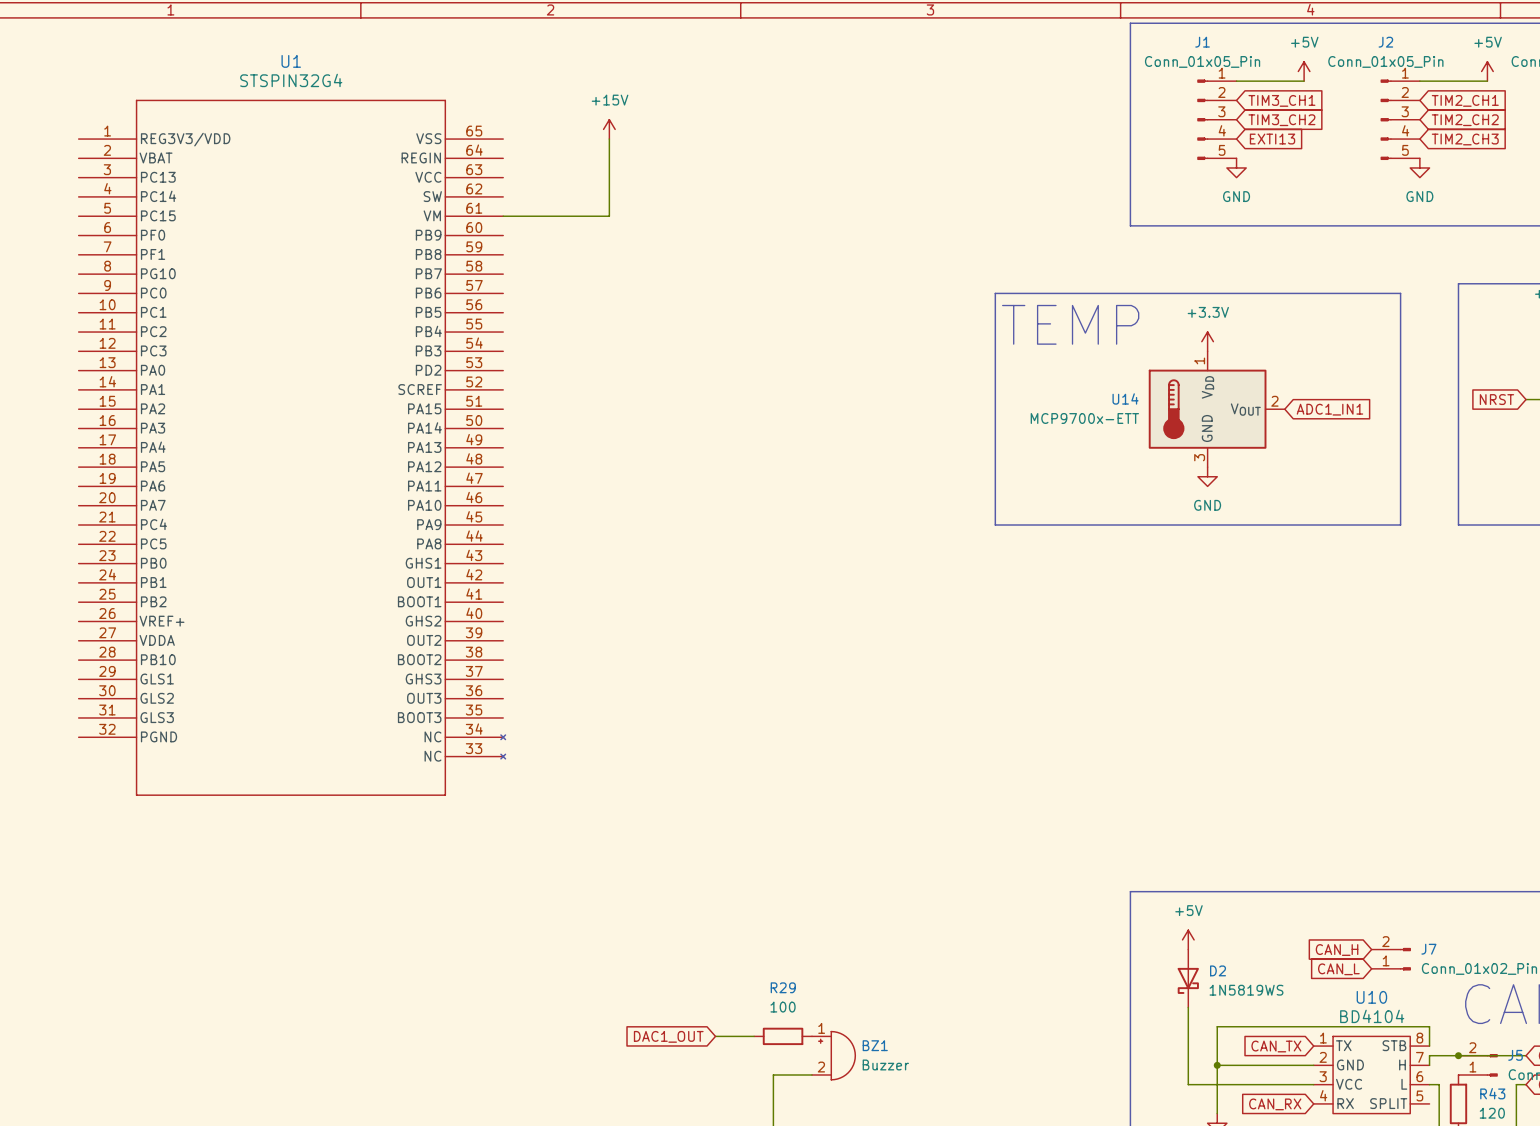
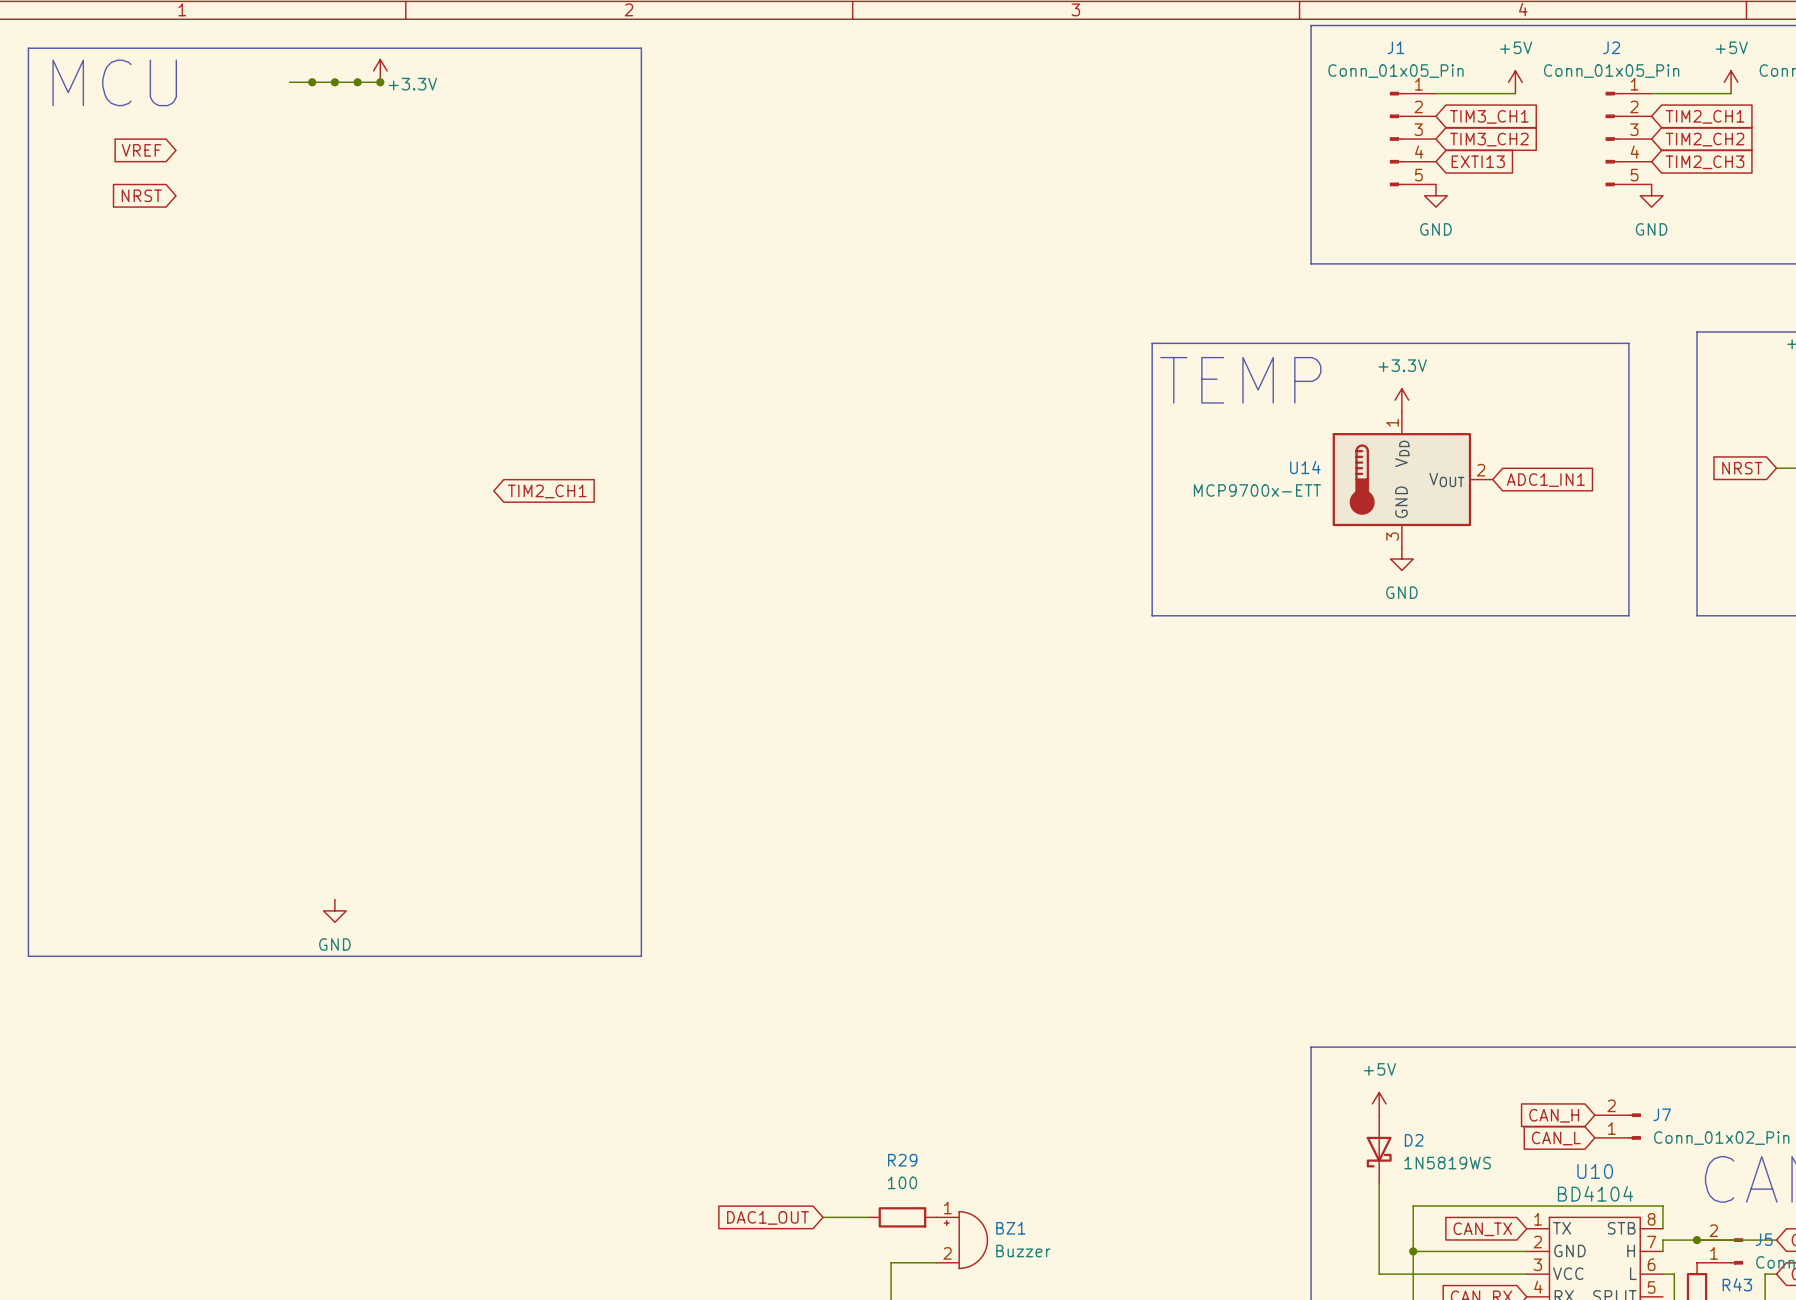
line: none -> (28, 48) (641, 48) (641, 956) (28, 956) (28, 48)
power symbol: none -> +3.3V (380, 70)
wire: none -> (289, 82) (380, 82)
junction: none -> (312, 82)
junction: none -> (334, 82)
junction: none -> (357, 82)
junction: none -> (380, 82)
text: none -> MCU (114, 82)
global label: none -> VREF (141, 150)
power symbol: +15V (609, 129) -> none
wire: (609, 139) (609, 216) (503, 216) -> none
global label: none -> NRST (141, 195)
global label: none -> TIM2_CH1 (547, 491)
U1: STSPIN32G4 (292, 447) -> none
power symbol: none -> GND (334, 910)

